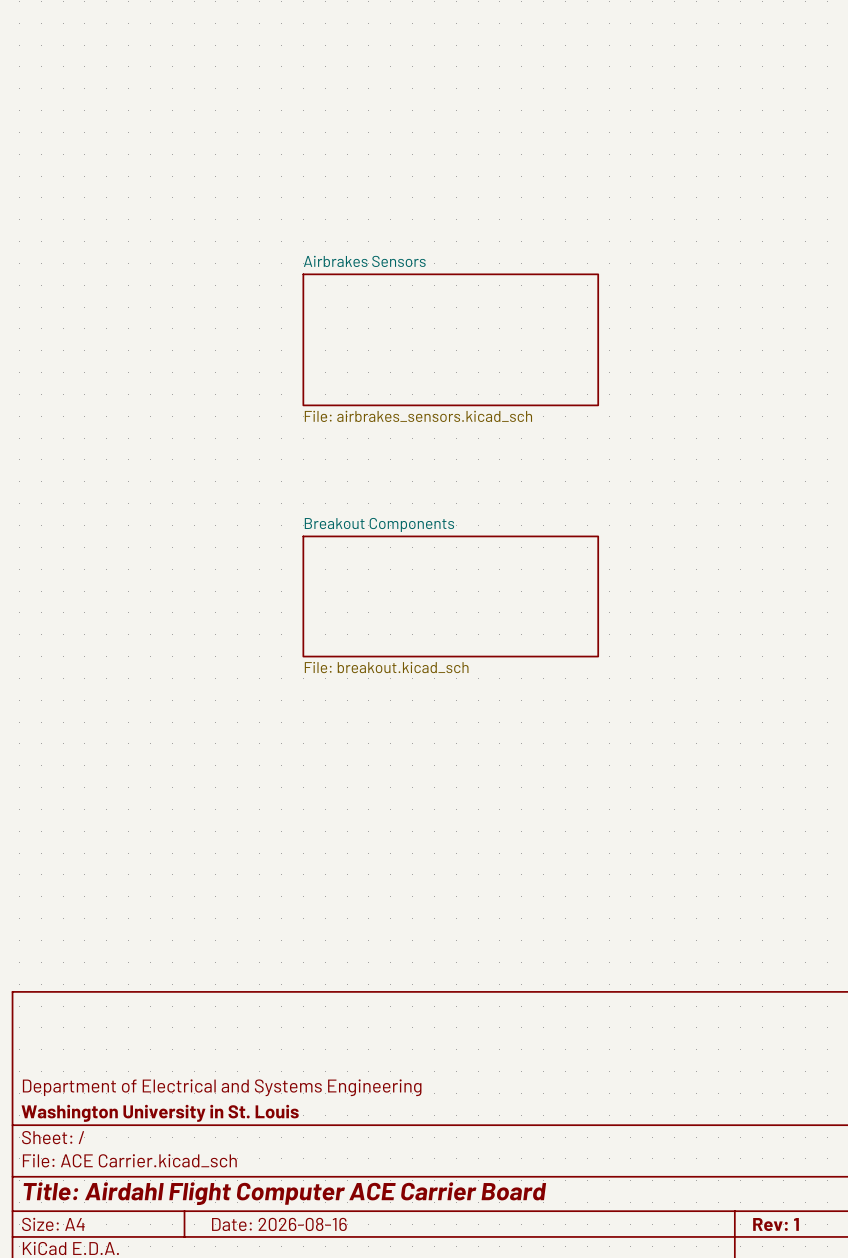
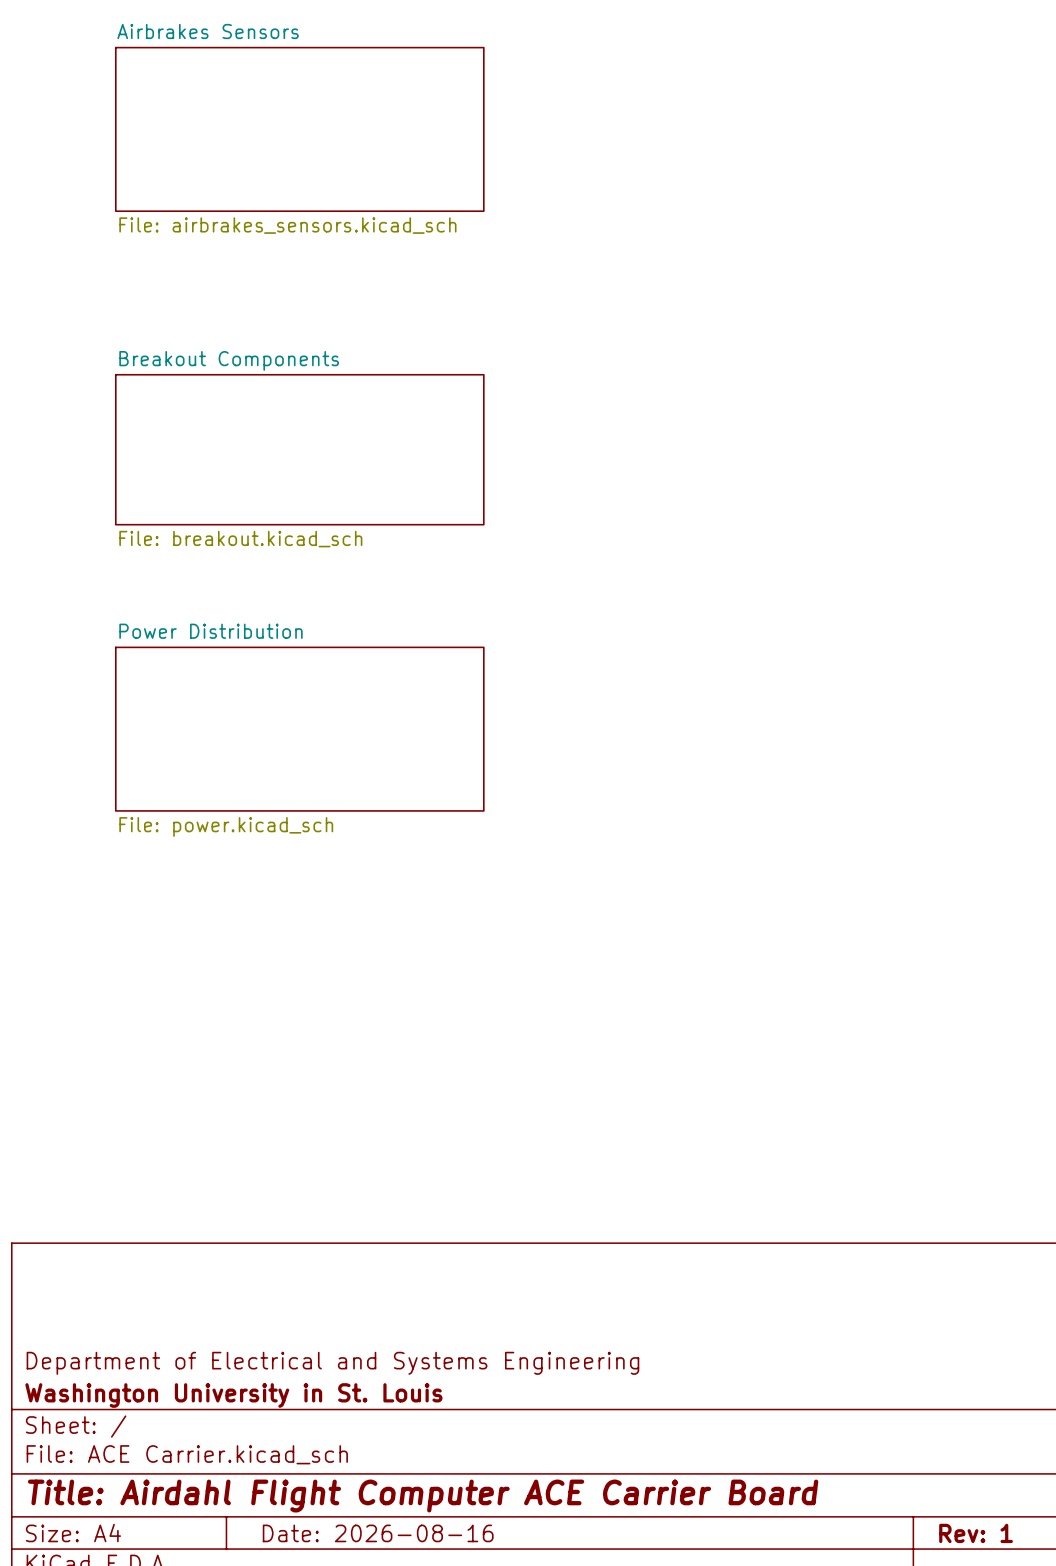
sheet Airbrakes Sensors: none -> File: airbrakes_sensors.kicad_sch (299, 129)
sheet Airbrakes Sensors: File: airbrakes_sensors.kicad_sch (450, 339) -> none
sheet Breakout Components: none -> File: breakout.kicad_sch (299, 449)
sheet Power Distribution: none -> File: power.kicad_sch (299, 729)
sheet Breakout Components: File: breakout.kicad_sch (450, 596) -> none

